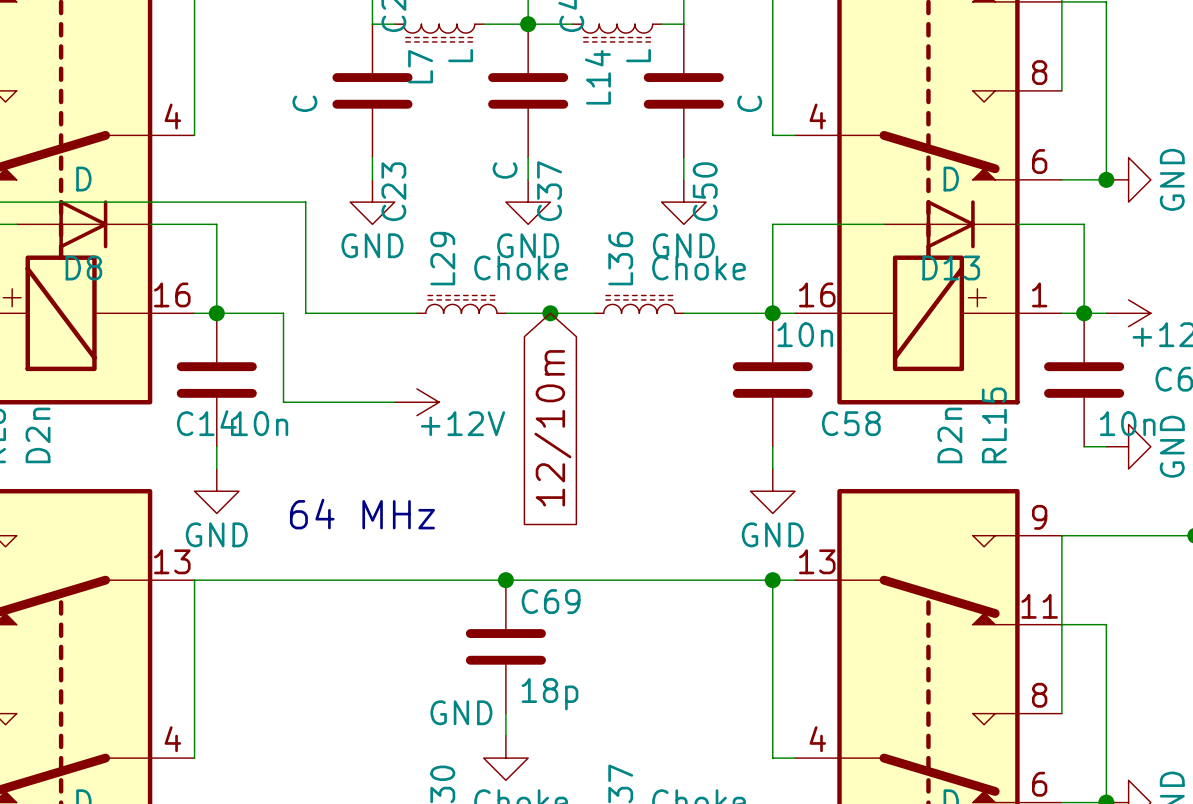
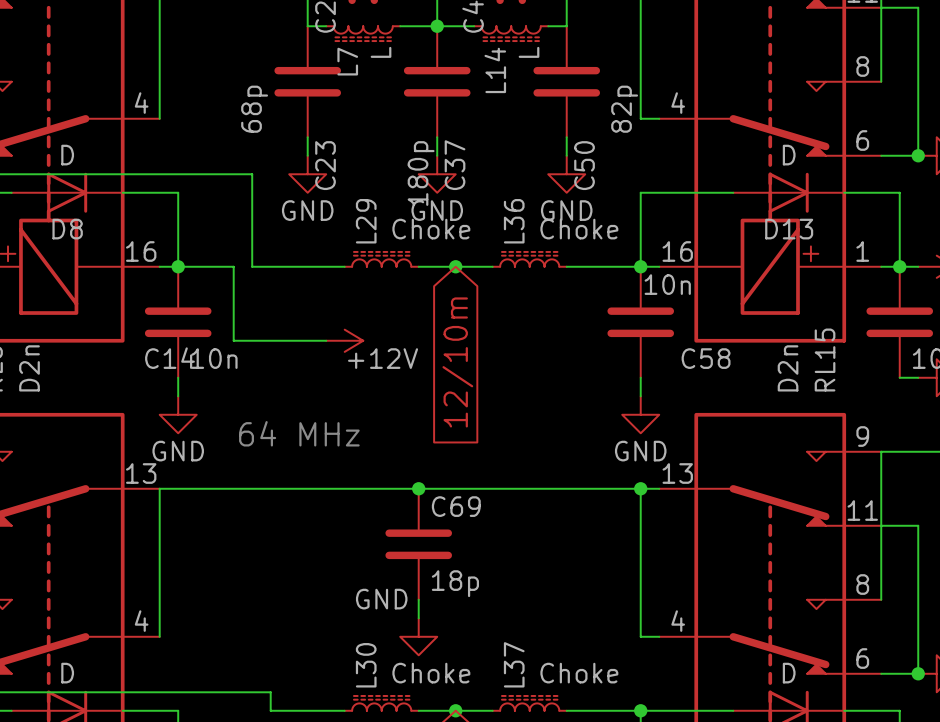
C23 value: C (304, 103) -> 68p (254, 109)
C50 value: C (749, 103) -> 82p (624, 109)
C37 value: C (505, 170) -> 180p (421, 173)

